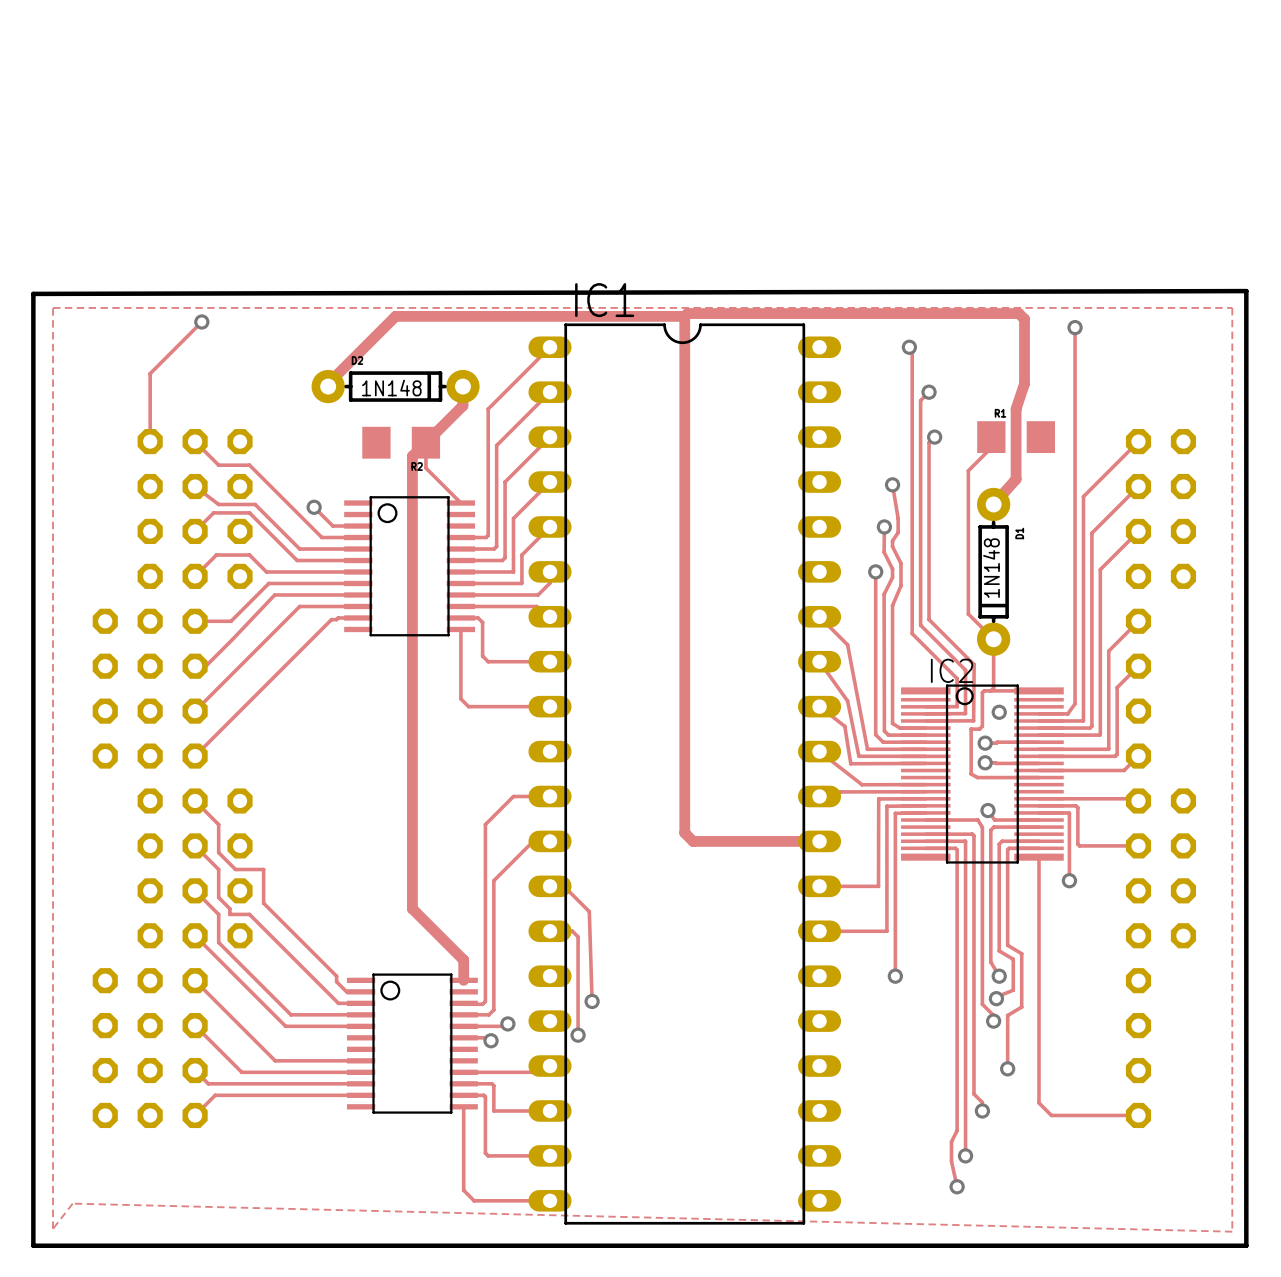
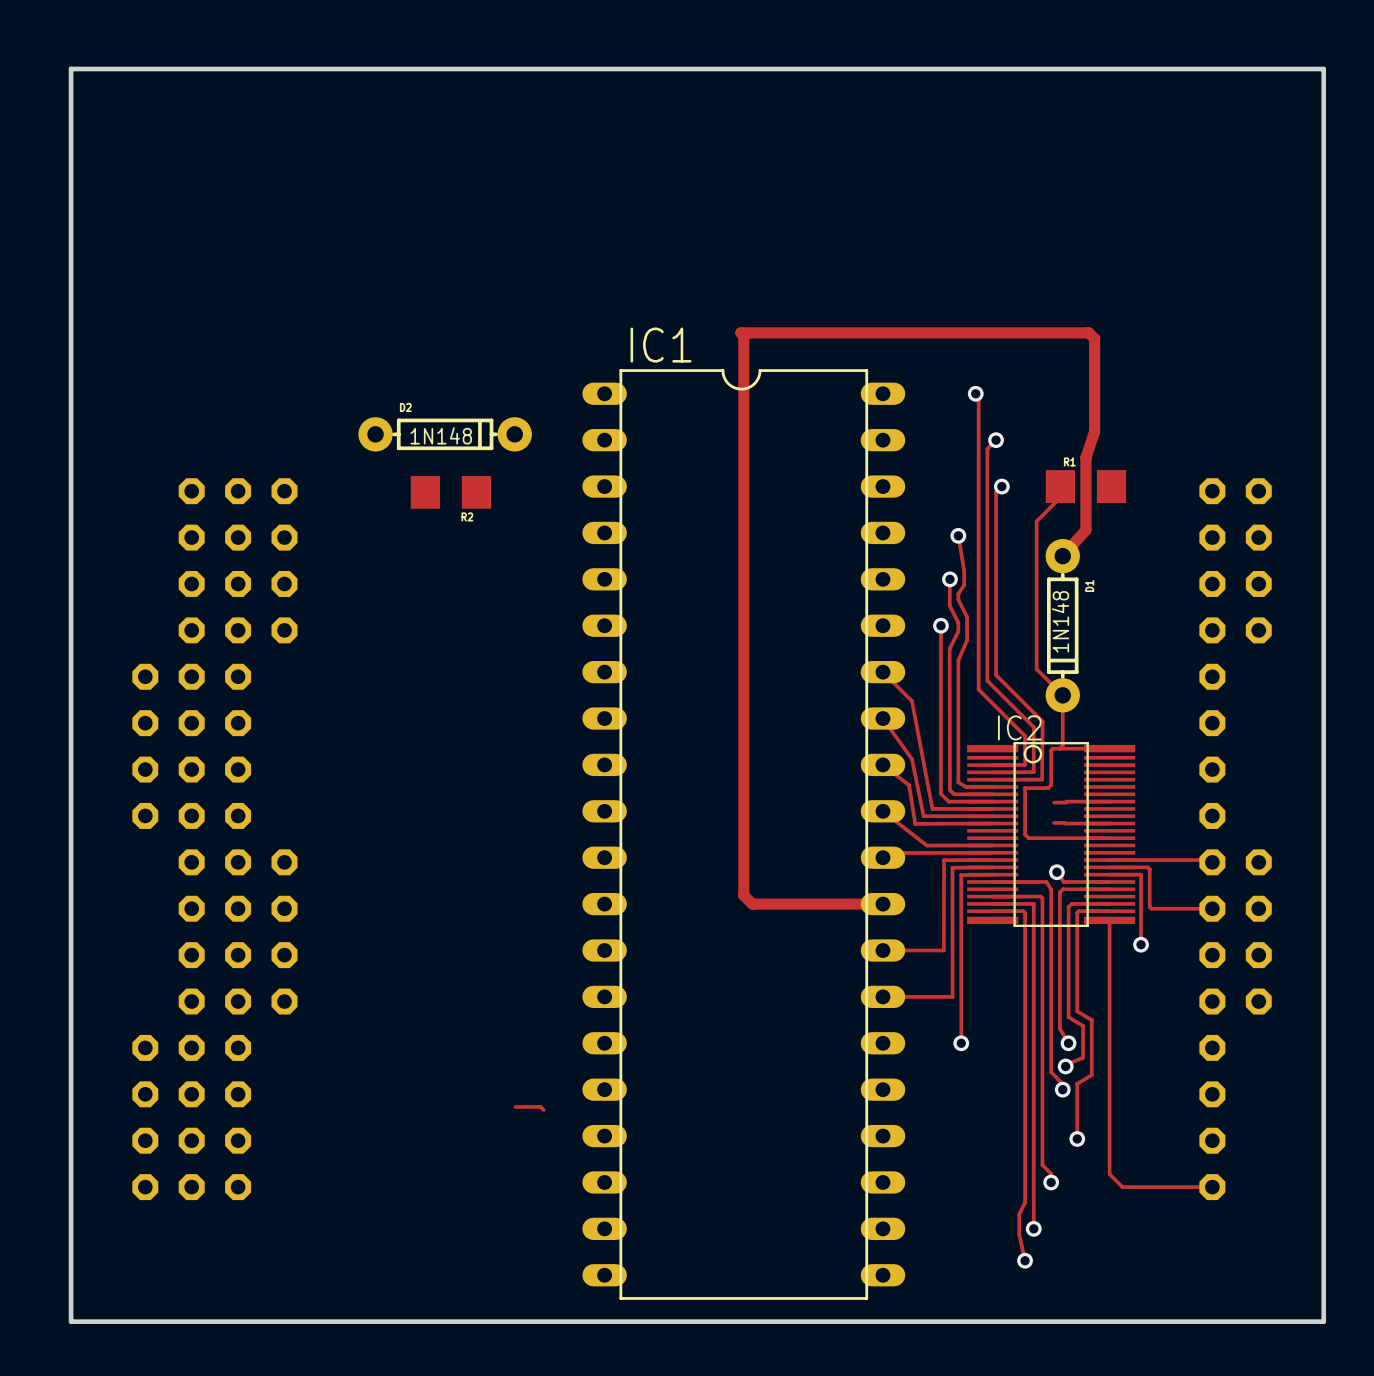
board edge: (1246, 291) (33, 293) -> (1323, 335) (1323, 69) (71, 69) (71, 338)
zone outline: (53, 307) (53, 1228) (72, 1203) (1232, 1231) (1232, 307) (53, 307) -> none
track: (1024, 319) (1018, 313) (395, 316) (328, 383) (328, 386) -> (1094, 364) (1094, 338) (1088, 332) (740, 332) (743, 335) (743, 361)
track: (201, 321) (150, 373) (150, 441) -> none
via: (201, 321) -> none
track: (1075, 327) (1075, 703) (1067, 713) (1038, 713) -> none
via: (1075, 327) -> none
track: (549, 347) (488, 409) (488, 535) (486, 537) (460, 537) -> none
track: (462, 386) (462, 405) (412, 456) (412, 908) (463, 960) (463, 980) -> none
track: (549, 392) (496, 445) (496, 546) (494, 549) (460, 549) -> none
track: (549, 437) (505, 482) (505, 557) (502, 560) (460, 560) -> none
track: (195, 441) (218, 465) (249, 465) (321, 537) (358, 537) -> none
track: (1138, 441) (1083, 496) (1083, 720) (1038, 720) -> none
track: (425, 442) (425, 468) (460, 503) -> none
track: (549, 482) (513, 518) (513, 571) -> none
track: (195, 486) (218, 504) (255, 504) (299, 549) (358, 549) -> none
track: (1138, 486) (1091, 533) (1091, 726) (1090, 728) (1038, 728) -> none
track: (314, 507) (332, 526) (358, 526) -> none
via: (314, 507) -> none
track: (549, 526) (521, 555) (521, 583) (460, 583) -> none
track: (195, 531) (213, 512) (249, 512) (297, 560) (358, 560) -> none
track: (1138, 531) (1100, 569) (1100, 734) (1038, 735) -> none
part: (409, 566) -> none
track: (549, 571) (549, 583) (538, 595) (460, 595) -> none
track: (358, 572) (266, 572) (249, 555) (216, 555) (195, 576) -> none
track: (460, 572) (513, 572) -> none
track: (358, 583) (268, 583) (231, 621) (195, 621) -> none
track: (358, 595) (274, 595) (205, 666) (195, 666) -> none
track: (358, 606) (299, 606) (195, 711) -> none
track: (460, 606) (536, 606) (549, 616) -> none
track: (358, 617) (331, 619) (195, 756) -> none
track: (460, 617) (478, 617) (482, 622) (482, 656) (488, 661) (549, 661) -> none
track: (1138, 621) (1108, 651) (1108, 748) (1038, 749) -> none
track: (460, 629) (460, 698) (468, 706) (549, 706) -> none
track: (1138, 666) (1117, 687) (1117, 754) (1115, 756) (1038, 756) -> none
via: (999, 712) -> none
track: (971, 729) (971, 774) (977, 777) -> (1039, 788) (1025, 788) (1025, 834) (1028, 838) (1046, 838)
via: (985, 743) -> none
track: (1138, 756) (1124, 770) (1038, 770) -> none
via: (985, 762) -> none
track: (549, 796) (513, 796) (485, 824) (485, 1001) (482, 1004) (463, 1003) -> none
track: (195, 800) (218, 824) (218, 852) (235, 869) (263, 869) (263, 903) (336, 976) (336, 981) (346, 991) (361, 991) -> none
track: (549, 841) (533, 841) (493, 880) (493, 1009) (488, 1014) (463, 1014) -> none
track: (195, 845) (218, 869) (218, 897) (229, 908) (229, 914) (249, 914) (338, 1003) (361, 1003) -> none
track: (549, 886) (564, 886) (589, 911) (592, 1001) -> none
track: (195, 890) (218, 914) (218, 942) (291, 1014) (361, 1014) -> none
track: (549, 931) (572, 931) (578, 936) (578, 1035) -> none
track: (195, 935) (285, 1026) (361, 1026) -> none
track: (195, 980) (275, 1060) (361, 1060) -> none
via: (592, 1001) -> none
track: (507, 1023) (505, 1026) (463, 1026) -> none
via: (507, 1023) -> none
track: (195, 1025) (241, 1072) (361, 1072) -> none
via: (578, 1035) -> none
via: (491, 1040) -> none
part: (412, 1043) -> none
track: (549, 1066) (543, 1072) (463, 1072) -> none
track: (195, 1070) (208, 1083) (361, 1083) -> none
track: (463, 1083) (491, 1083) (493, 1085) (493, 1110) (549, 1110) -> none
track: (361, 1095) (215, 1095) (195, 1115) -> none
track: (463, 1095) (485, 1096) (485, 1153) (488, 1155) (549, 1155) -> none
track: (463, 1106) (463, 1190) (474, 1200) (549, 1200) -> none

